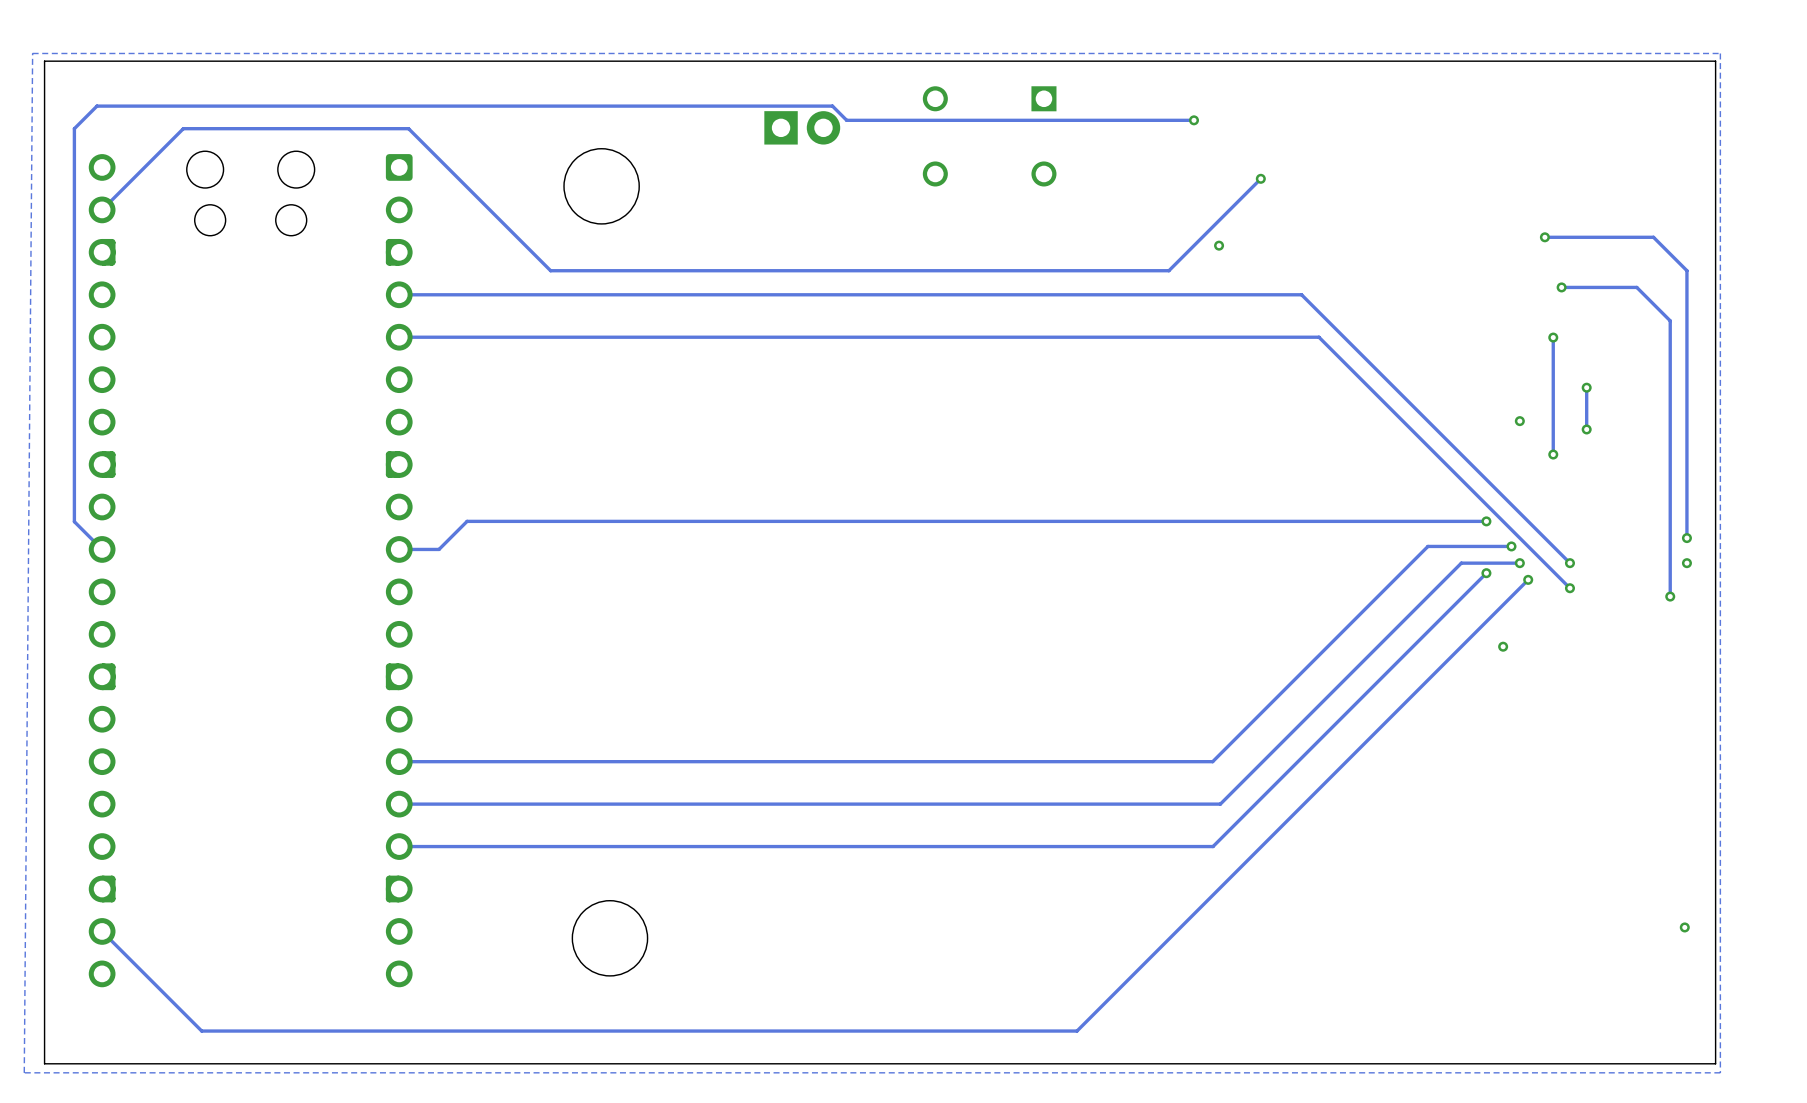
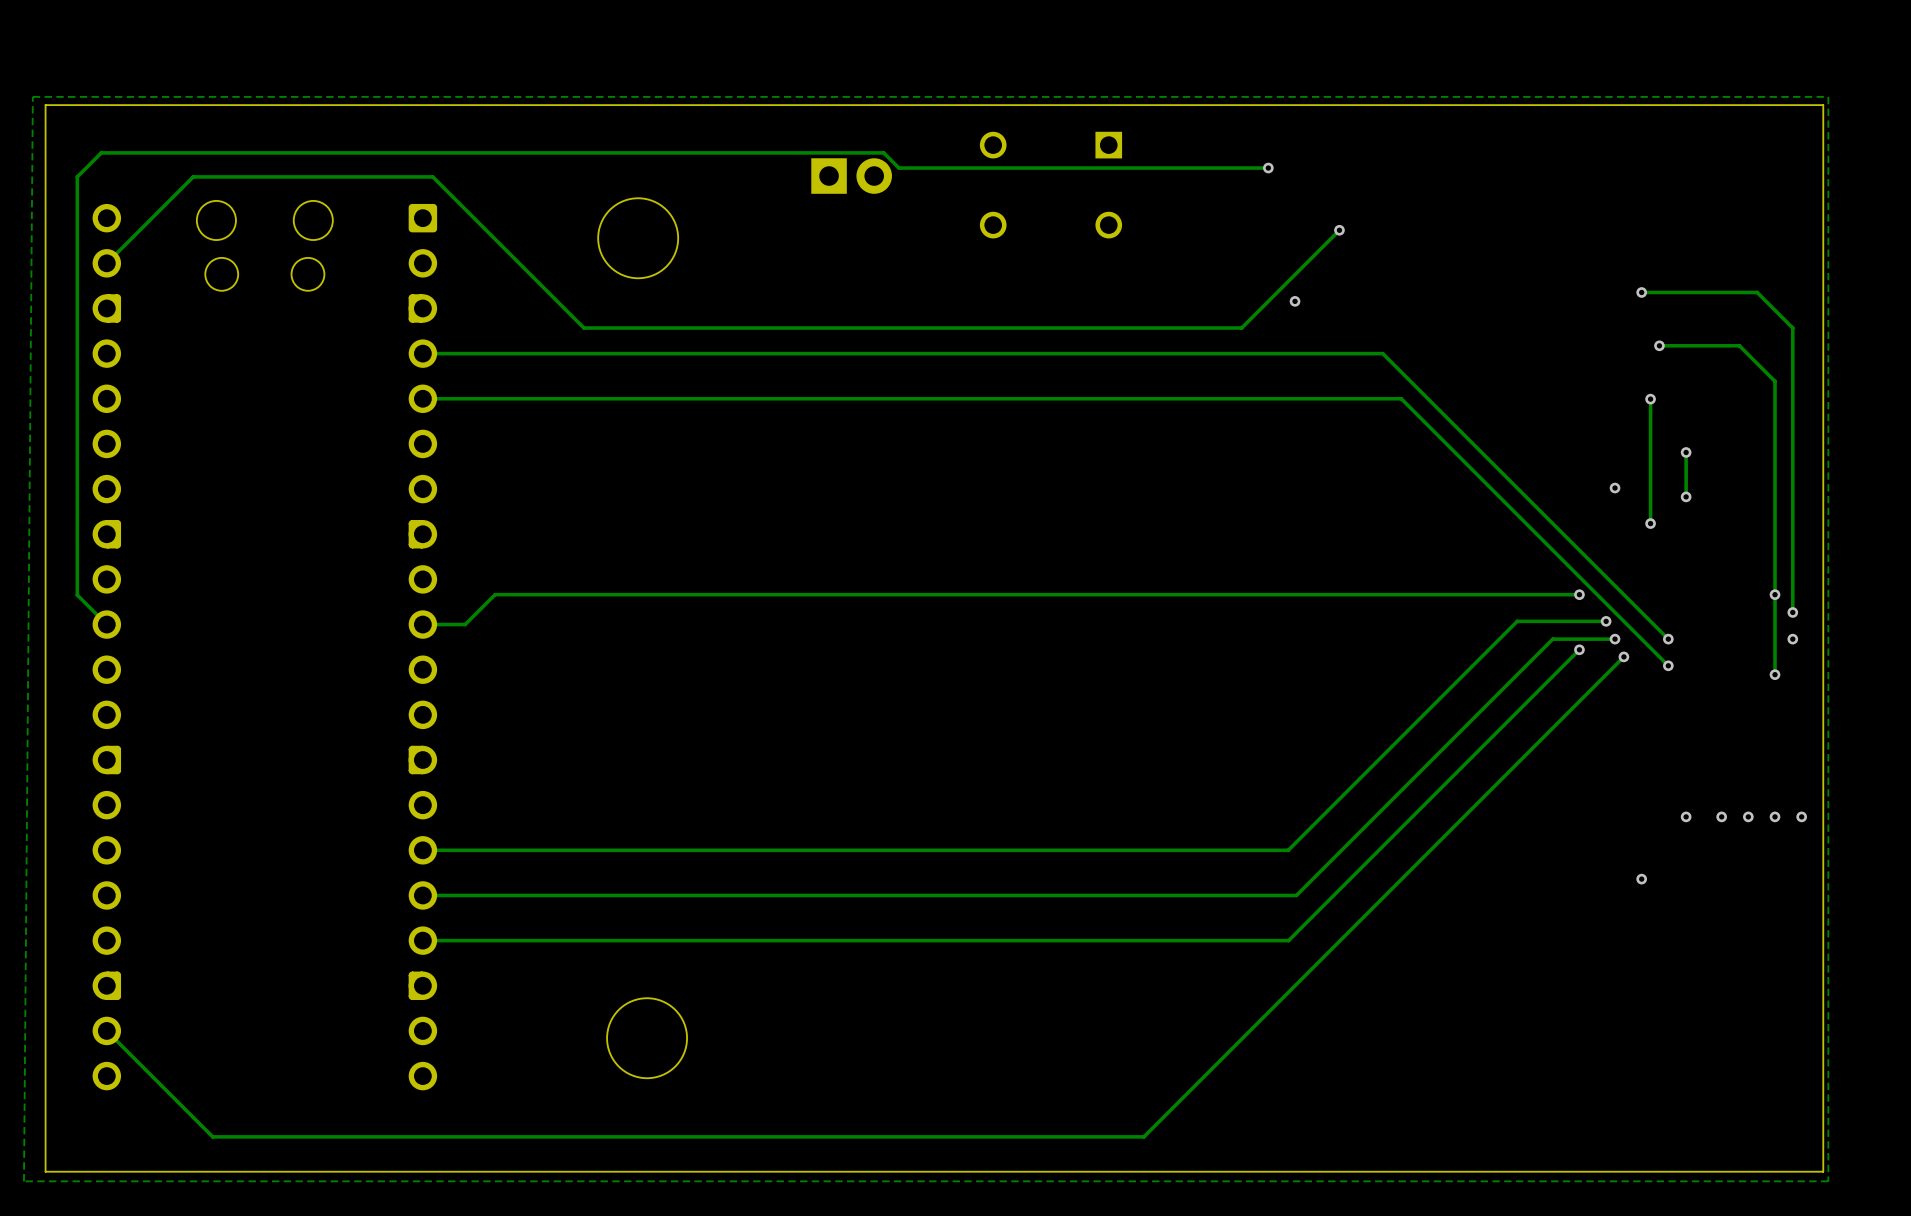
via: none -> (1775, 594)
via: (1503, 646) -> none
via: none -> (1686, 816)
via: none -> (1721, 816)
via: none -> (1748, 816)
via: none -> (1775, 816)
via: none -> (1801, 816)
via: none -> (1641, 879)
via: (1684, 927) -> none

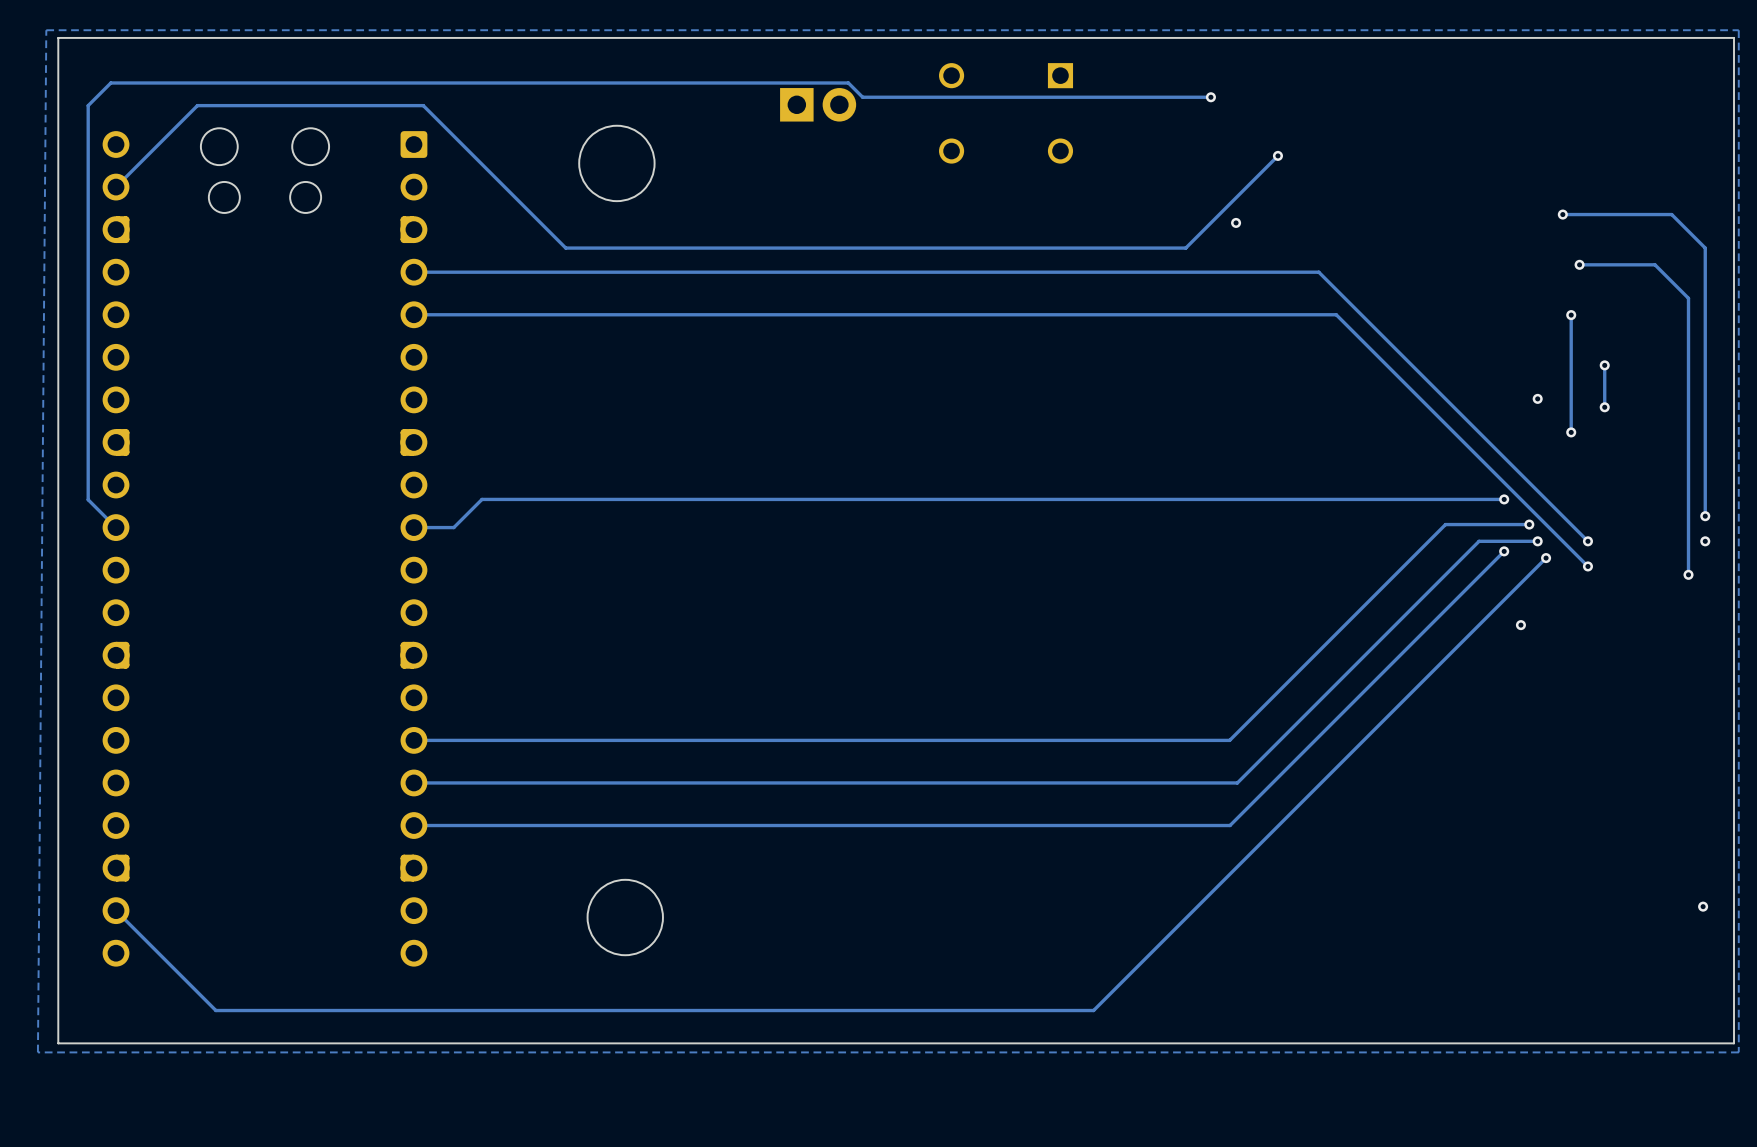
via: (1775, 594) -> none
via: none -> (1520, 625)
via: (1686, 816) -> none
via: (1721, 816) -> none
via: (1748, 816) -> none
via: (1775, 816) -> none
via: (1801, 816) -> none
via: (1641, 879) -> none
via: none -> (1703, 906)

